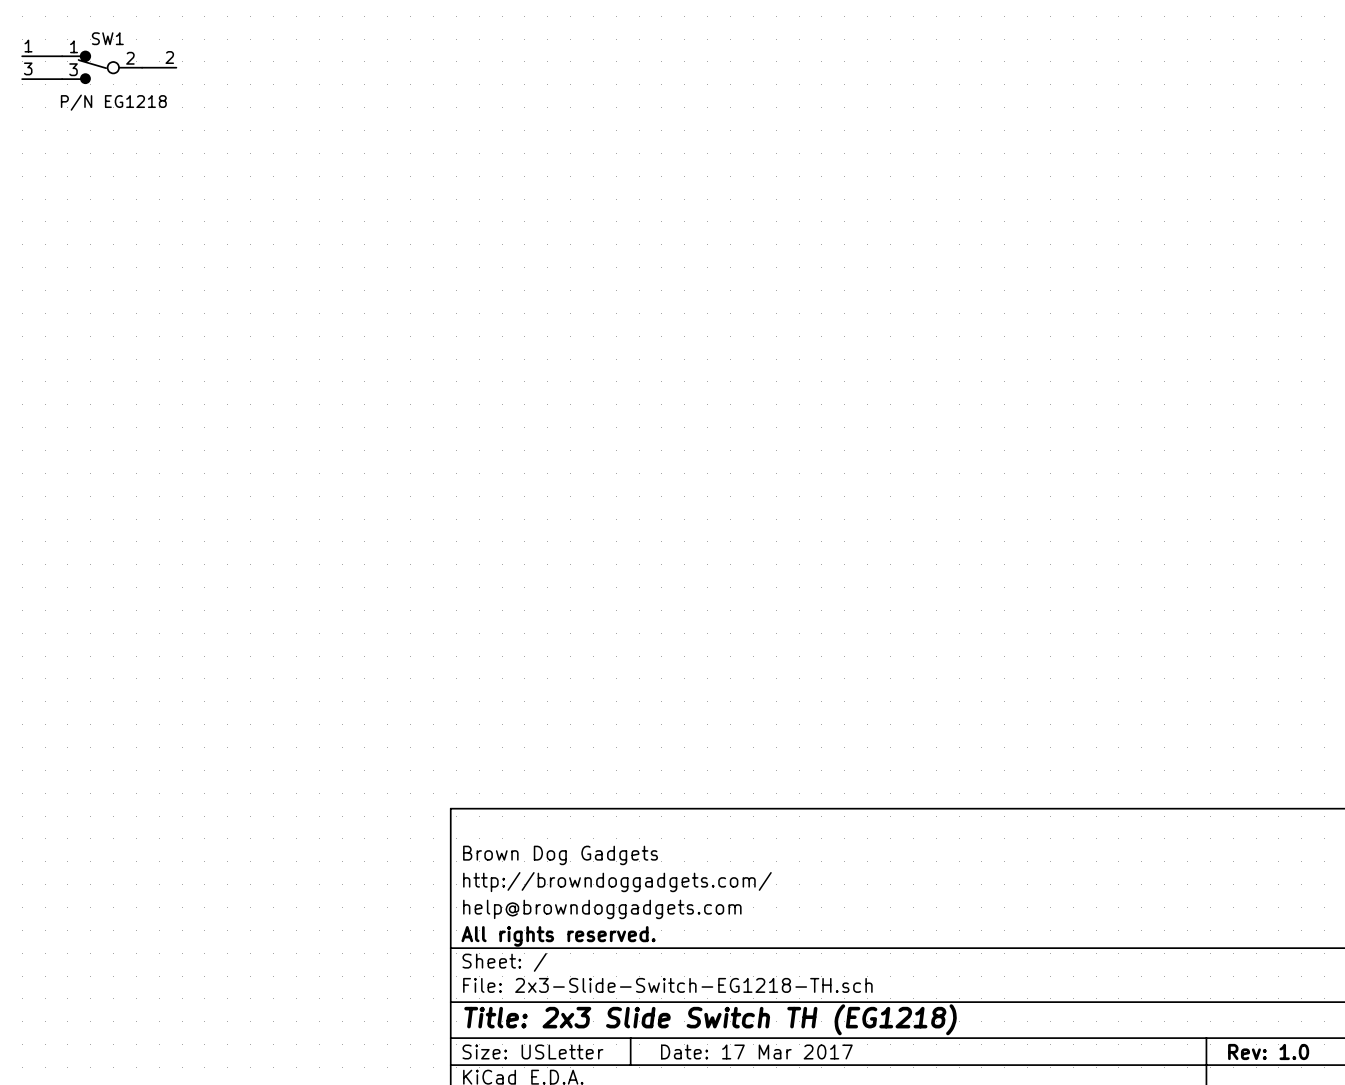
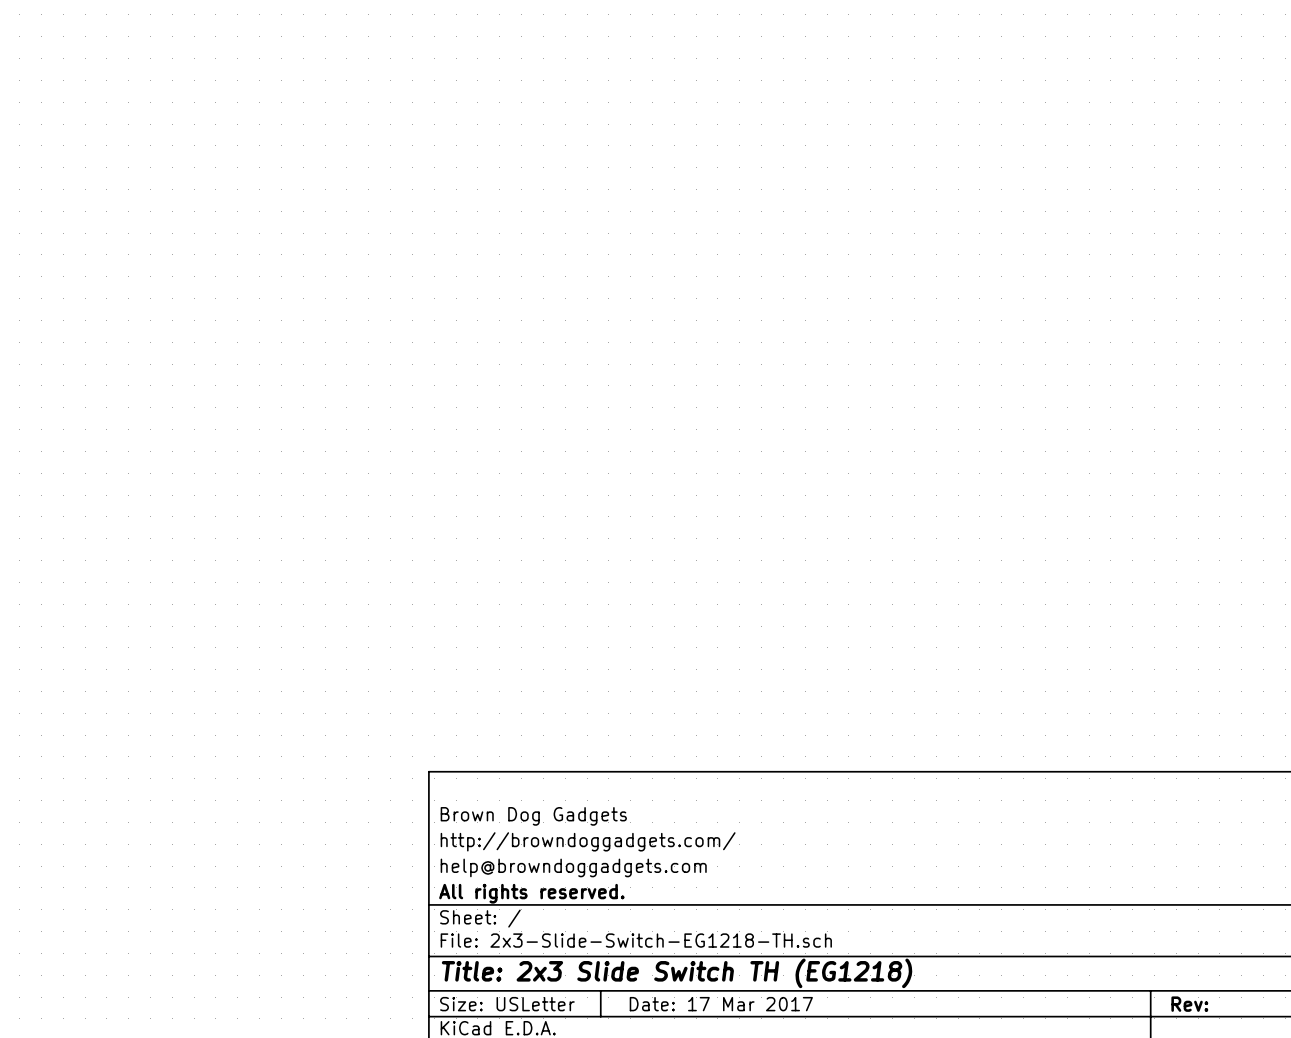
label: 1 (28, 46) -> none
wire: (22, 56) (62, 56) -> none
label: 2 (169, 57) -> none
SW1: P/N EG1218 (102, 67) -> none
wire: (142, 67) (176, 67) -> none
label: 3 (28, 68) -> none
wire: (22, 79) (62, 79) -> none
title block: Rev: 1.0 (1268, 1051) -> Rev: (1189, 1004)

